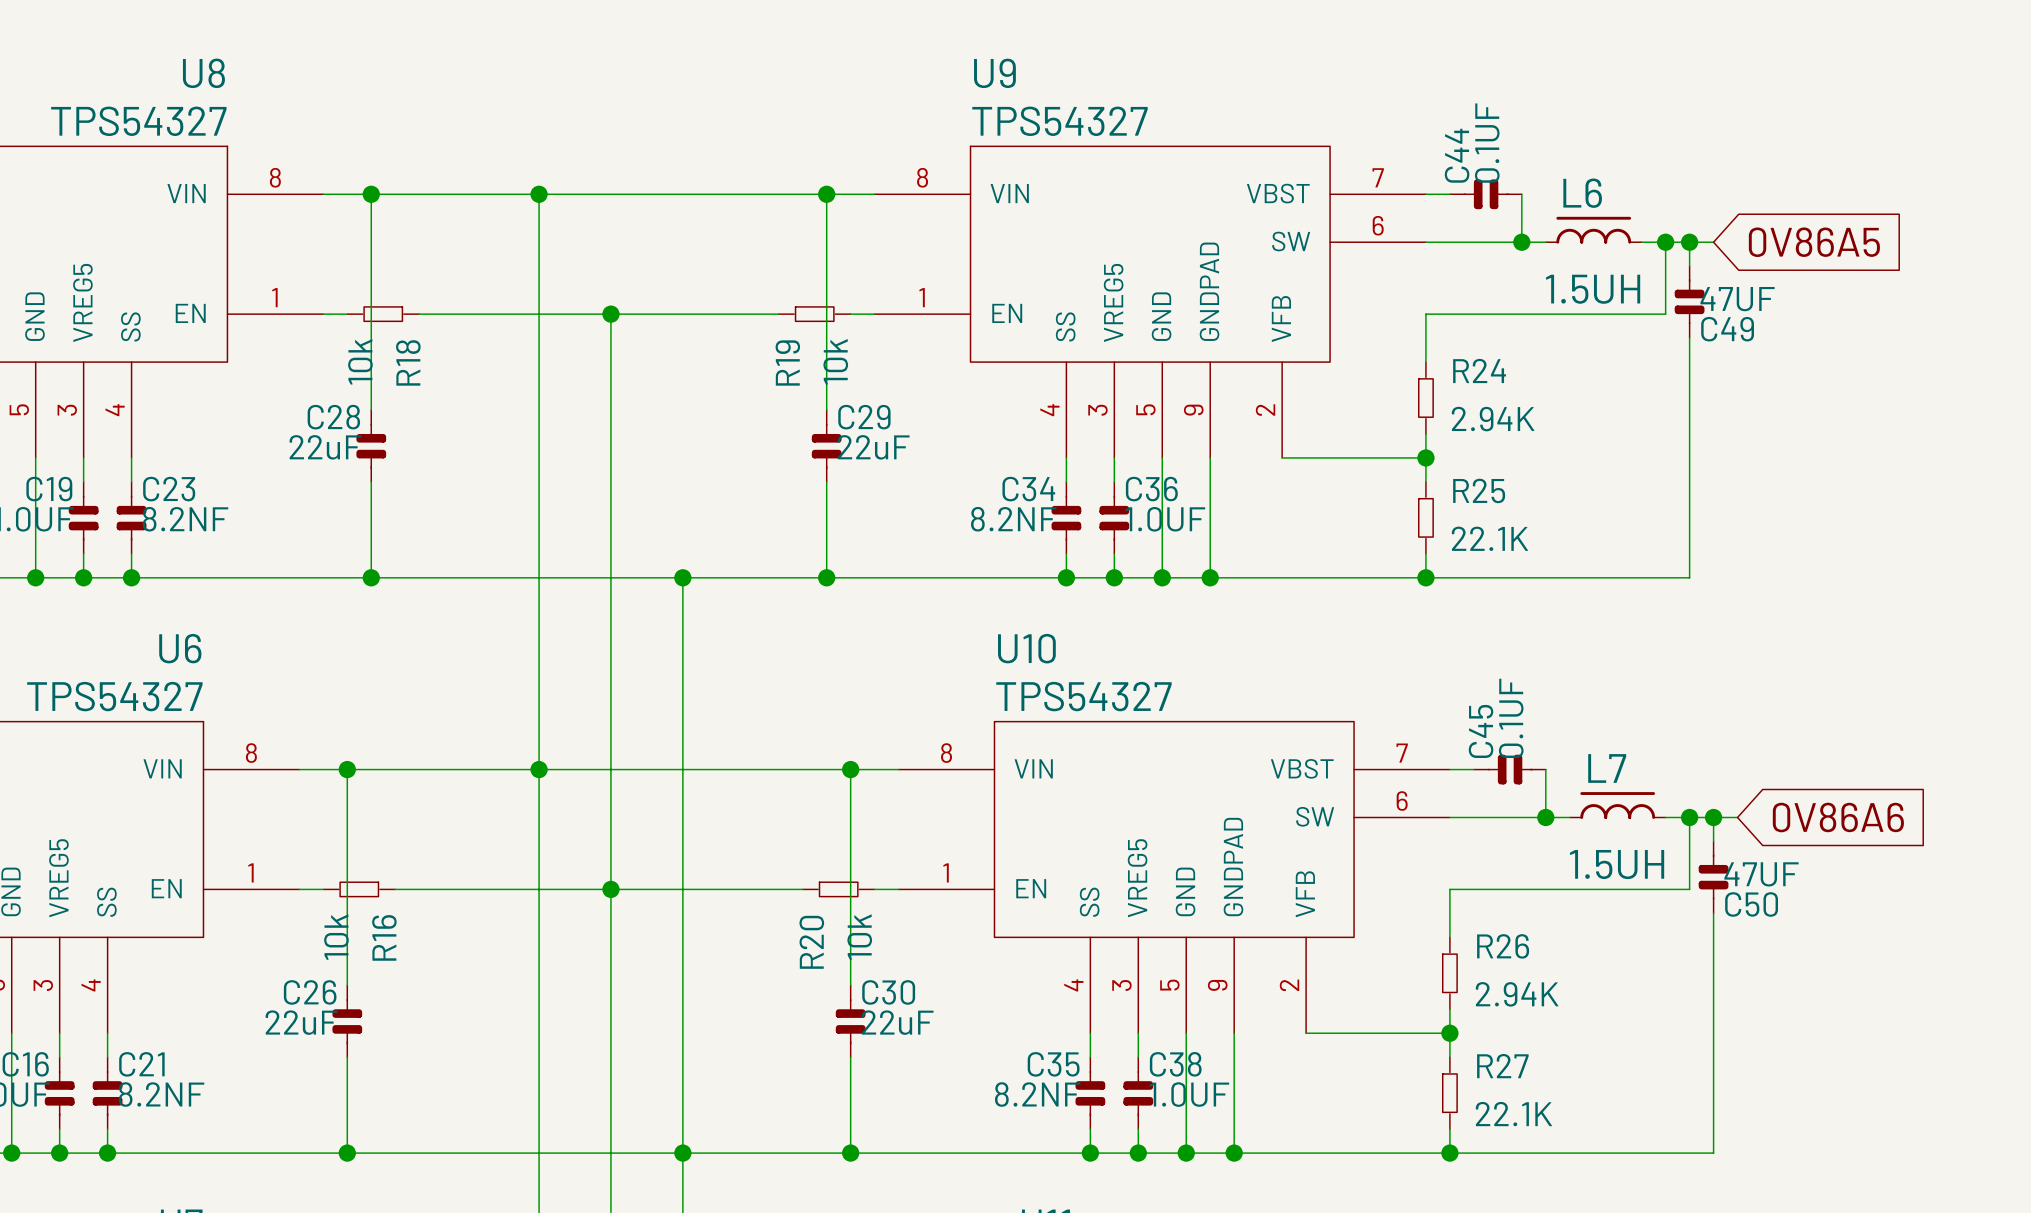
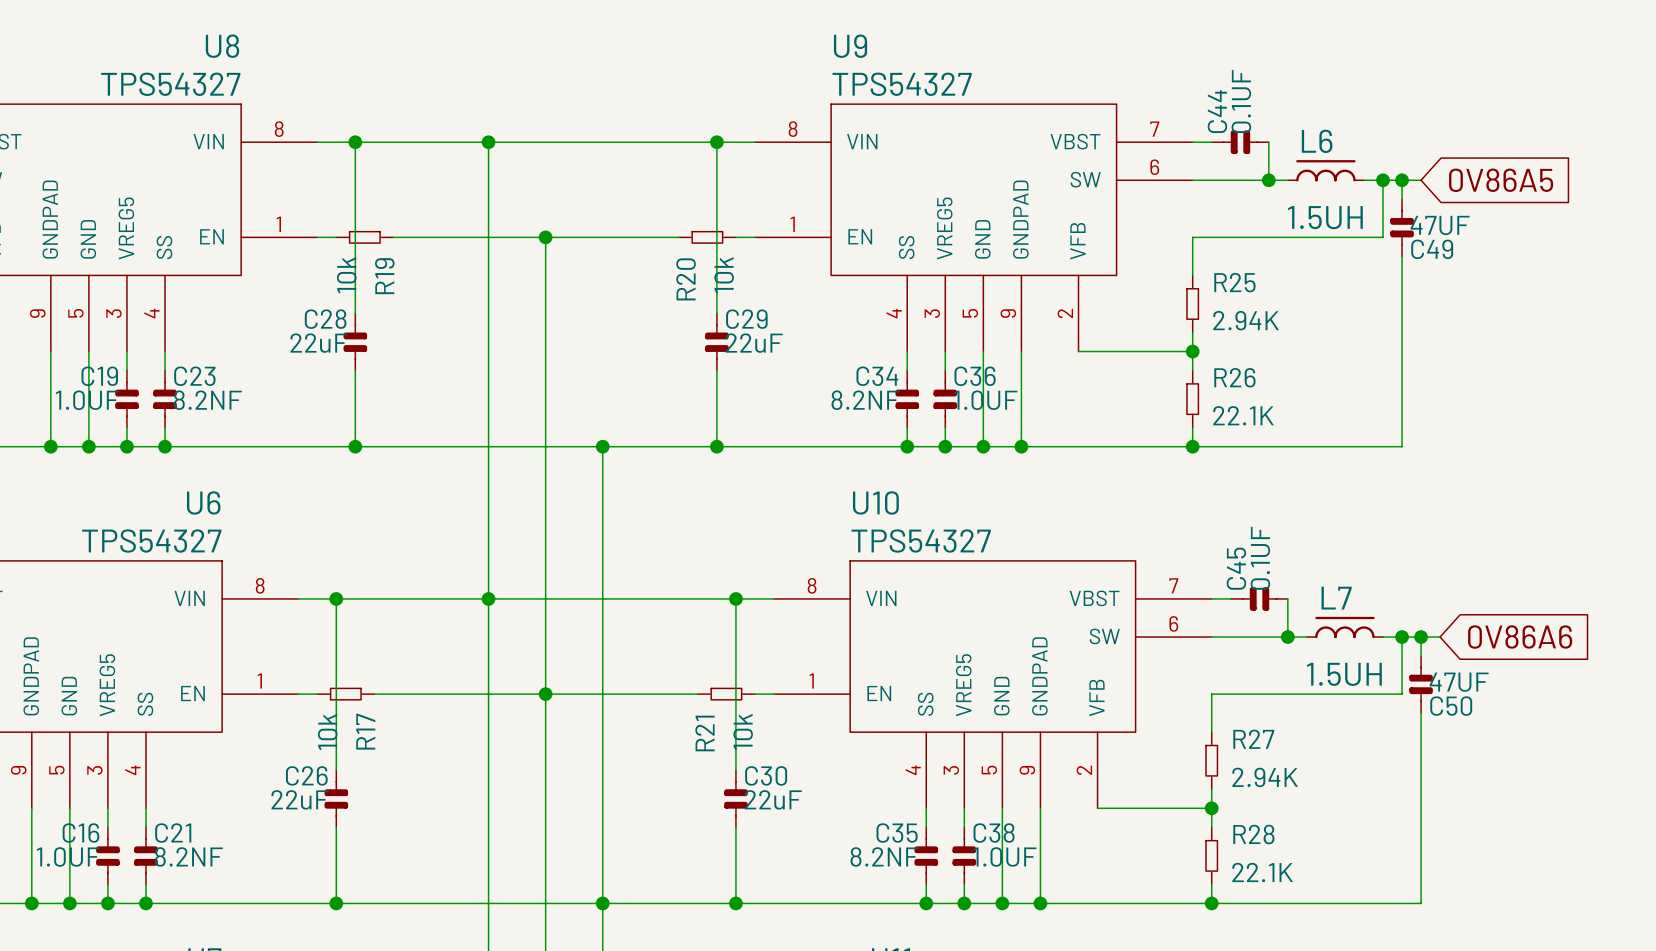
R18 name: R18 (408, 362) -> R19 (384, 276)
R19 name: R19 (787, 363) -> R20 (686, 279)
R24 name: R24 (1479, 370) -> R25 (1234, 282)
R25 name: R25 (1479, 490) -> R26 (1234, 377)
R16 name: R16 (384, 937) -> R17 (365, 731)
R20 name: R20 (811, 942) -> R21 (704, 733)
R26 name: R26 (1503, 946) -> R27 (1253, 739)
R27 name: R27 (1502, 1066) -> R28 (1253, 834)

